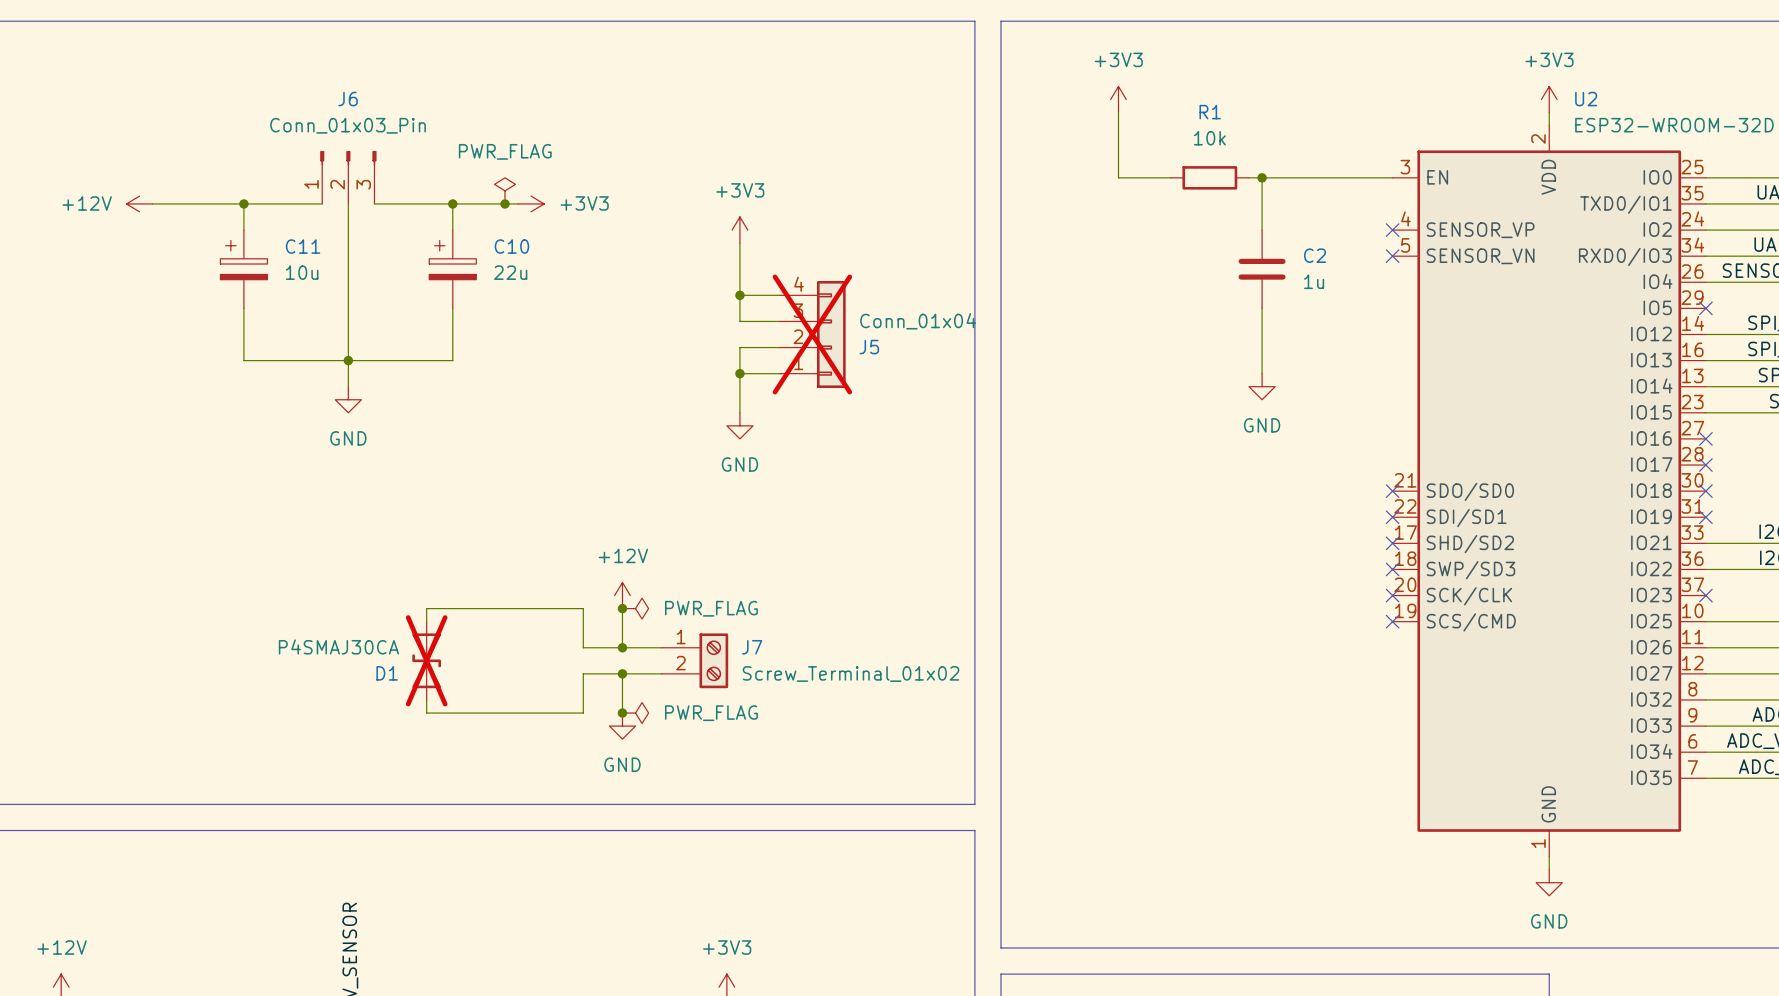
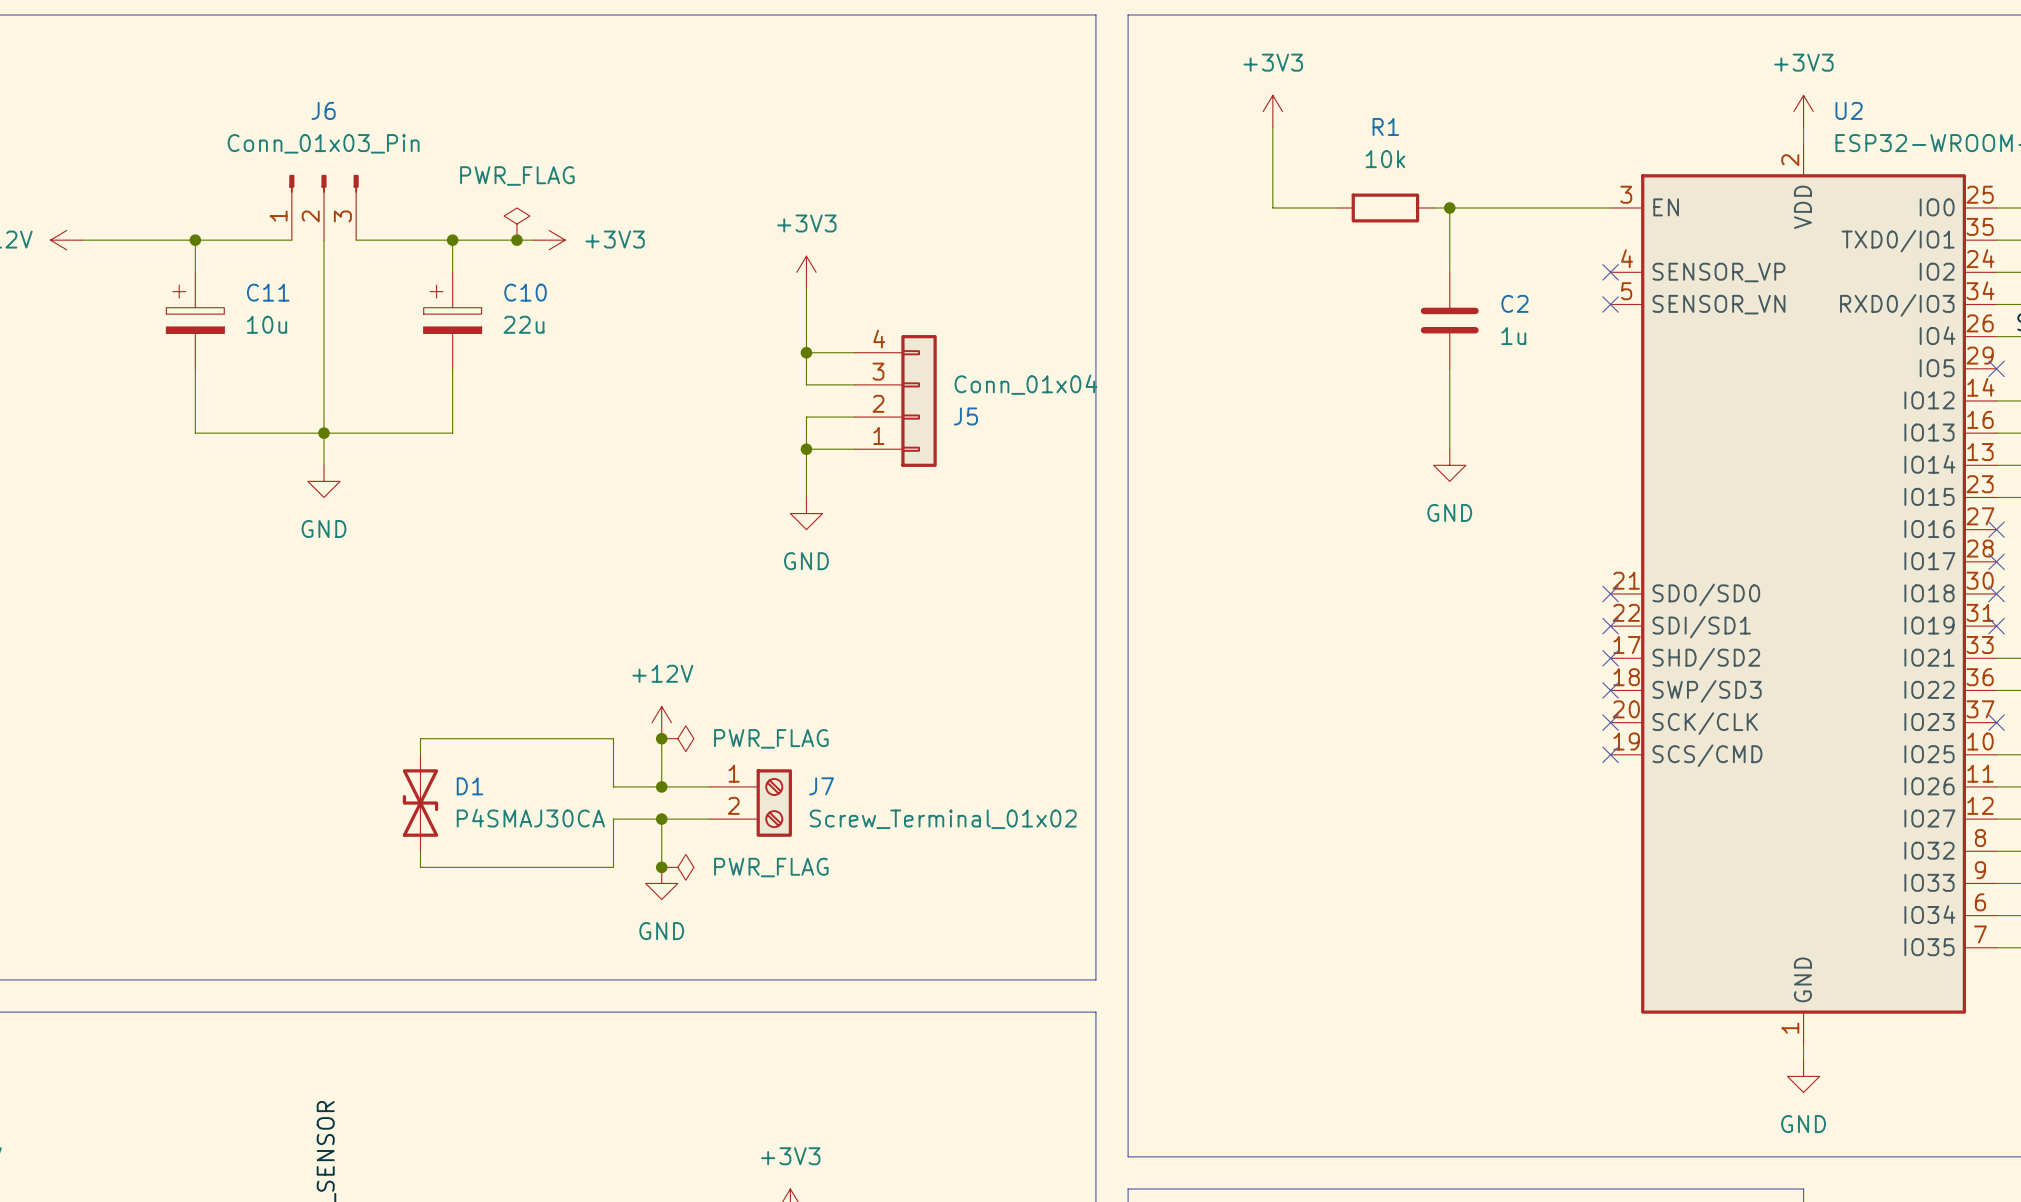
J5 do-not-place cross: (812, 334) -> none
D1 value position: P4SMAJ30CA (338, 646) -> P4SMAJ30CA (530, 818)
D1 do-not-place cross: (426, 660) -> none
D1 name position: D1 (387, 673) -> D1 (470, 786)

